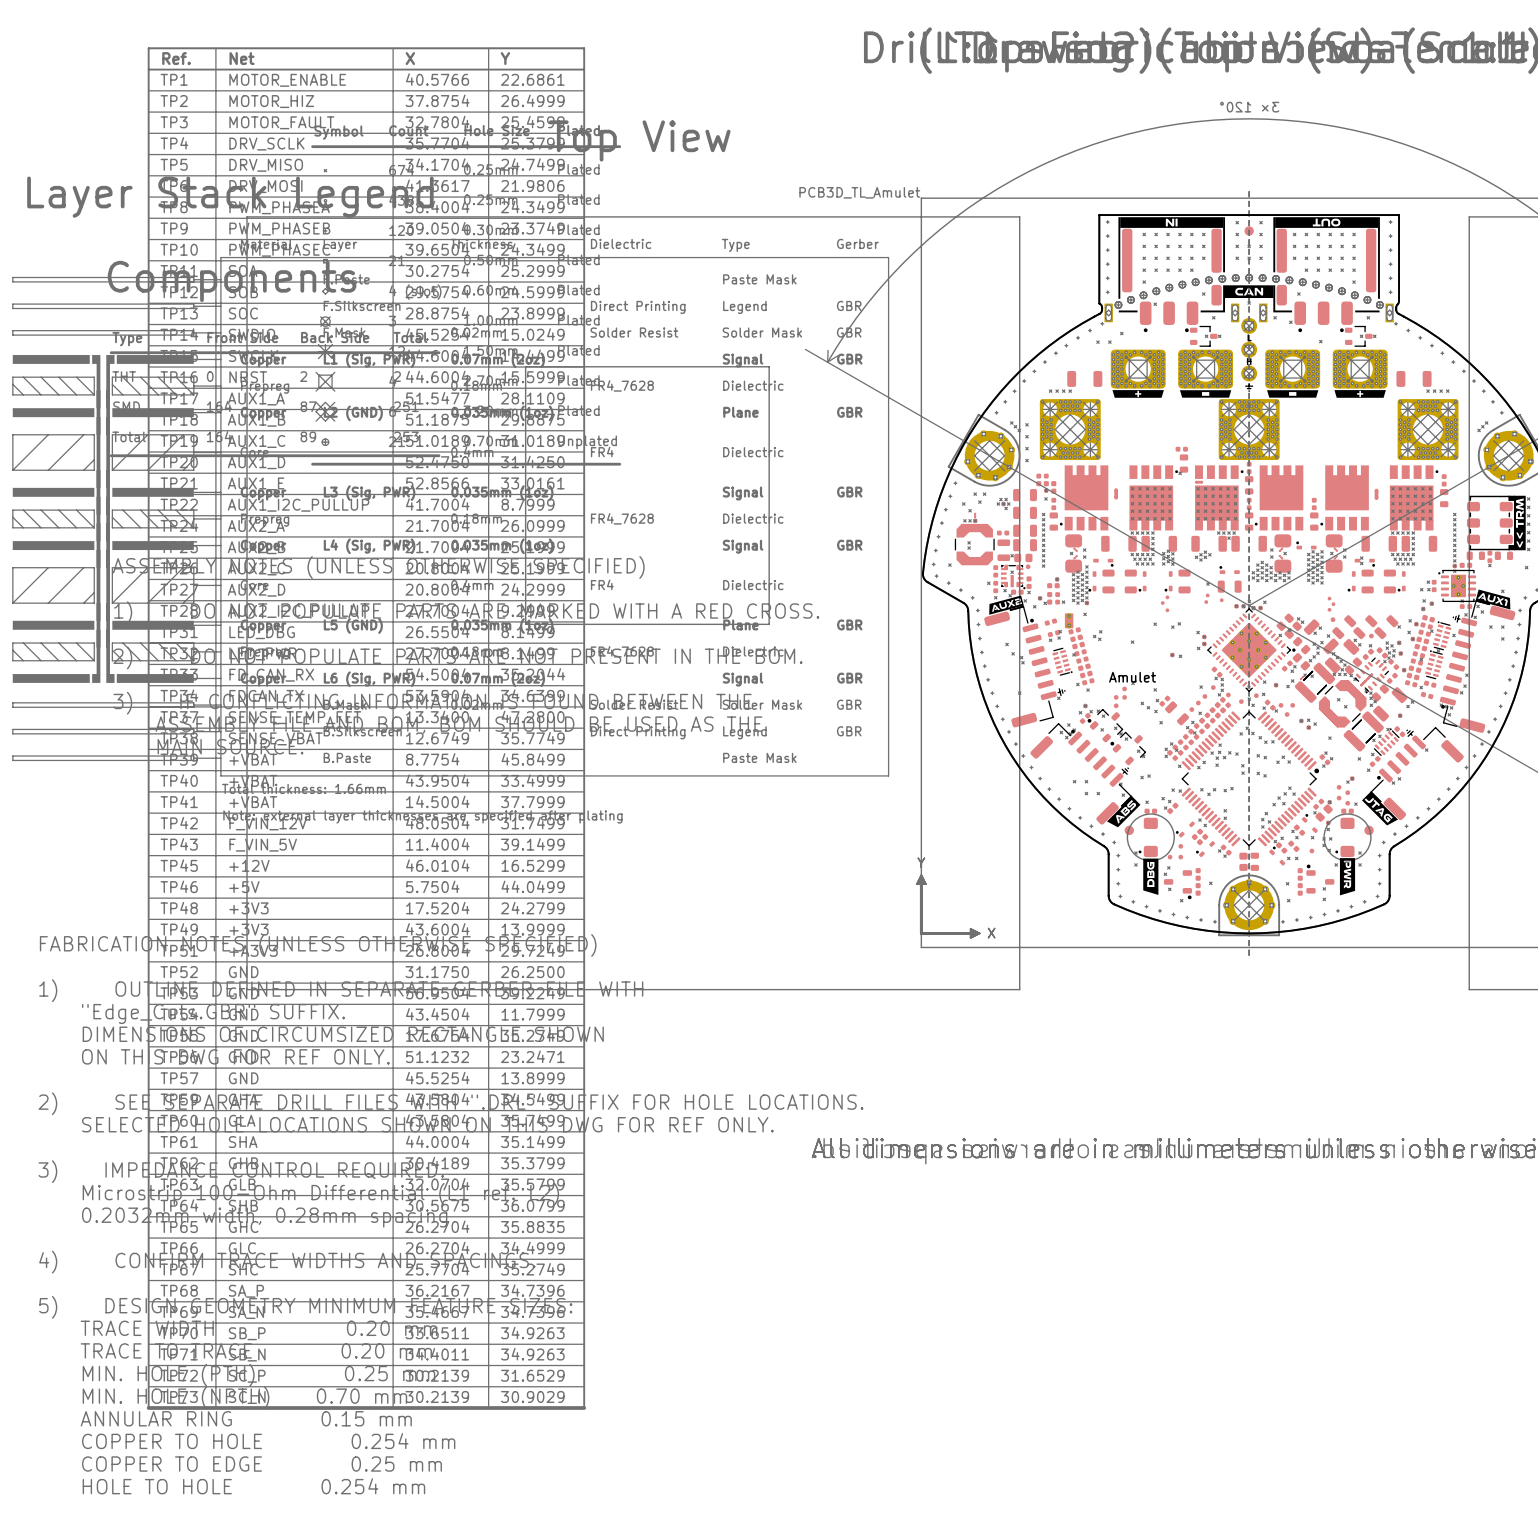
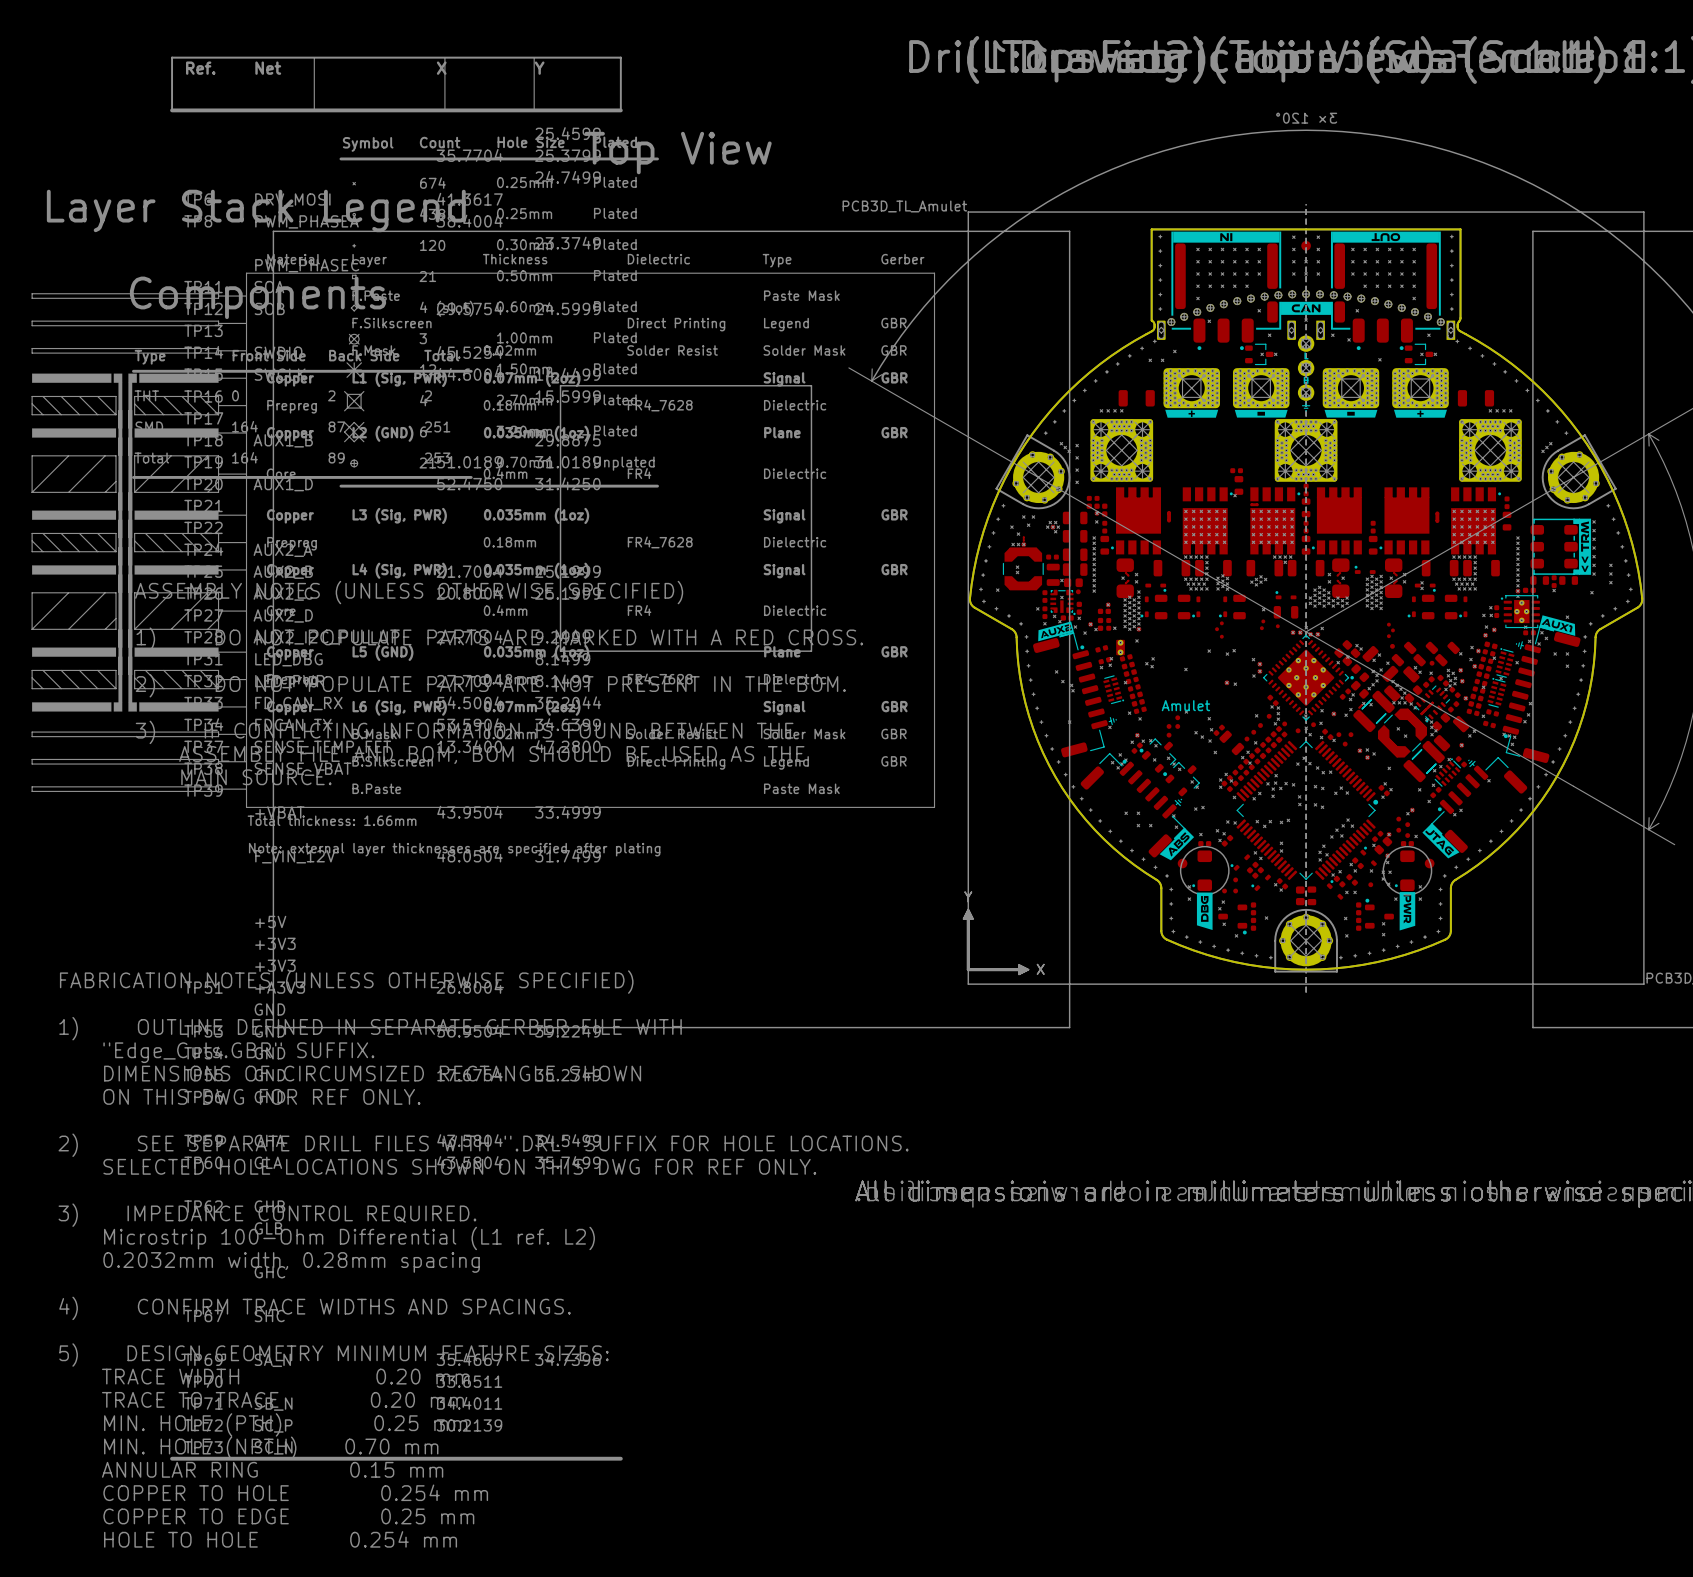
line: (215, 48) (215, 1408) -> none
line: none -> (314, 57) (314, 110)
line: (393, 48) (393, 1408) -> none
line: none -> (444, 57) (444, 110)
line: (488, 48) (488, 1408) -> none
line: none -> (534, 57) (534, 110)
line: (148, 69) (584, 69) -> none
text: TP1 (174, 79) -> none
text: 40.5766 (437, 79) -> none
text: 22.6861 (532, 79) -> none
text: MOTOR_ENABLE (287, 80) -> none
line: (148, 90) (584, 90) -> none
line: (148, 99) (148, 1408) (584, 1408) (584, 99) -> (172, 110) (620, 110) (172, 110)
text: 37.8754 (437, 100) -> none
text: 26.4999 (532, 100) -> none
text: TP2 (174, 101) -> none
text: MOTOR_HIZ (271, 101) -> none
line: (148, 112) (584, 112) -> none
text: TP3 (174, 122) -> none
text: MOTOR_FAULT (281, 122) -> none
text: 32.7804 (437, 122) -> none
line: (148, 133) (584, 133) -> none
text: TP4 (174, 143) -> none
text: DRV_SCLK (266, 144) -> none
line: (148, 154) (584, 154) -> none
text: TP5 (174, 164) -> none
text: 34.1704 (437, 164) -> none
text: DRV_MISO (266, 165) -> none
line: (148, 175) (584, 175) -> none
text: 21.9806 (532, 186) -> none
line: (148, 197) (584, 197) -> none
text: 24.3499 (532, 207) -> none
line: (148, 218) (584, 218) -> none
text: TP9 (174, 228) -> none
text: 39.0504 (437, 228) -> none
text: PWM_PHASEB (279, 229) -> none
line: (148, 239) (584, 239) -> none
text: TP10 (179, 249) -> none
text: 39.6504 (437, 249) -> none
text: 24.3499 (532, 249) -> none
line: (148, 260) (584, 260) -> none
text: 30.2754 (437, 270) -> none
text: 25.2999 (532, 271) -> none
line: (148, 282) (584, 282) -> none
line: (148, 303) (584, 303) -> none
text: SOC (243, 313) -> none
text: 28.8754 (437, 313) -> none
text: 23.8999 (532, 313) -> none
line: (148, 324) (584, 324) -> none
text: 15.0249 (533, 334) -> none
line: (148, 345) (584, 345) -> none
line: (148, 367) (584, 367) -> none
text: 44.6004 (437, 376) -> none
text: NRST (248, 377) -> none
line: (148, 388) (584, 388) -> none
text: AUX1_A (256, 398) -> none
text: 51.5477 (437, 398) -> none
text: 28.1109 (532, 398) -> none
line: (148, 409) (584, 409) -> none
text: 51.1875 (437, 419) -> none
line: (148, 430) (584, 430) -> none
text: AUX1_C (256, 441) -> none
line: (148, 451) (584, 451) -> none
line: (148, 473) (584, 473) -> none
text: AUX1_E (256, 483) -> none
text: 52.8566 (437, 483) -> none
text: 33.0161 (532, 483) -> none
line: (148, 494) (584, 494) -> none
text: 41.7004 (437, 504) -> none
text: 8.7999 (528, 504) -> none
text: AUX1_I2C_PULLUP (298, 505) -> none
line: (148, 515) (584, 515) -> none
text: 21.7004 (437, 525) -> none
text: 26.0999 (532, 525) -> none
line: (148, 536) (584, 536) -> none
line: (148, 558) (584, 558) -> none
line: (148, 579) (584, 579) -> none
text: 20.8004 (437, 589) -> none
text: 24.2999 (532, 589) -> none
line: (148, 600) (584, 600) -> none
line: (148, 621) (584, 621) -> none
text: 26.5504 (437, 631) -> none
line: (148, 643) (584, 643) -> none
line: (148, 664) (584, 664) -> none
line: (148, 685) (584, 685) -> none
line: (148, 706) (584, 706) -> none
line: (148, 728) (584, 728) -> none
text: 12.6749 (437, 738) -> none
text: 35.7749 (532, 738) -> none
line: (148, 749) (584, 749) -> none
text: +VBAT (253, 759) -> none
text: 8.7754 (432, 759) -> none
text: 45.8499 (533, 759) -> none
line: (148, 770) (584, 770) -> none
text: TP40 (179, 780) -> none
line: (148, 791) (584, 791) -> none
text: TP41 (179, 801) -> none
text: 14.5004 (437, 801) -> none
text: +VBAT (253, 802) -> none
text: 37.7999 (532, 802) -> none
line: (148, 813) (584, 813) -> none
text: TP42 (179, 823) -> none
line: (148, 834) (584, 834) -> none
text: TP43 (179, 844) -> none
text: 11.4004 (437, 844) -> none
text: 39.1499 (532, 844) -> none
text: F_VIN_5V (263, 845) -> none
line: (148, 855) (584, 855) -> none
text: TP45 (179, 865) -> none
text: +12V (249, 865) -> none
text: 46.0104 (437, 865) -> none
text: 16.5299 (533, 865) -> none
line: (148, 876) (584, 876) -> none
text: TP46 (179, 886) -> none
text: 5.7504 (432, 886) -> none
text: 44.0499 (533, 886) -> none
line: (148, 898) (584, 898) -> none
text: TP48 (179, 908) -> none
text: 17.5204 (437, 908) -> none
text: 24.2799 (532, 908) -> none
line: (148, 919) (584, 919) -> none
text: TP49 (179, 929) -> none
text: 43.6004 (437, 929) -> none
text: 13.9999 (533, 929) -> none
line: (148, 940) (584, 940) -> none
text: 29.7249 (532, 950) -> none
line: (148, 961) (584, 961) -> none
text: TP52 (179, 972) -> none
text: 31.1750 (437, 972) -> none
text: 26.2500 (532, 972) -> none
line: (148, 983) (584, 983) -> none
line: (148, 1004) (584, 1004) -> none
text: 43.4504 (437, 1014) -> none
text: 11.7999 (533, 1014) -> none
line: (148, 1025) (584, 1025) -> none
line: (148, 1046) (584, 1046) -> none
text: 23.2471 (532, 1056) -> none
text: 51.1232 (437, 1057) -> none
line: (148, 1068) (584, 1068) -> none
text: TP57 (179, 1078) -> none
text: GND (243, 1078) -> none
text: 45.5254 (437, 1078) -> none
text: 13.8999 (533, 1078) -> none
line: (148, 1089) (584, 1089) -> none
line: (148, 1110) (584, 1110) -> none
line: (148, 1131) (584, 1131) -> none
text: 44.0004 (437, 1141) -> none
text: 35.1499 (532, 1141) -> none
text: TP61 (179, 1142) -> none
text: SHA (243, 1142) -> none
line: (148, 1153) (584, 1153) -> none
text: 30.4189 (437, 1163) -> none
text: 35.3799 (532, 1163) -> none
line: (148, 1174) (584, 1174) -> none
text: TP63 (179, 1184) -> none
text: 32.0704 (437, 1184) -> none
text: 35.5799 (532, 1184) -> none
line: (148, 1195) (584, 1195) -> none
text: TP64 (179, 1205) -> none
text: SHB (243, 1205) -> none
text: 30.5675 (437, 1205) -> none
text: 36.0799 (532, 1205) -> none
line: (148, 1216) (584, 1216) -> none
text: 26.2704 (437, 1226) -> none
text: TP65 (179, 1227) -> none
text: 35.8835 (532, 1227) -> none
line: (148, 1238) (584, 1238) -> none
text: TP66 (179, 1248) -> none
text: GLC (242, 1248) -> none
text: 26.2704 (437, 1248) -> none
text: 34.4999 (532, 1248) -> none
line: (148, 1259) (584, 1259) -> none
text: 25.7704 (437, 1269) -> none
text: 35.2749 (532, 1269) -> none
line: (148, 1280) (584, 1280) -> none
text: TP68 (179, 1290) -> none
text: 36.2167 (437, 1290) -> none
text: 34.7396 (532, 1290) -> none
text: SA_P (246, 1291) -> none
line: (148, 1301) (584, 1301) -> none
line: (148, 1323) (584, 1323) -> none
text: 34.9263 (532, 1332) -> none
text: SB_P (247, 1333) -> none
line: (148, 1344) (584, 1344) -> none
text: 34.9263 (532, 1354) -> none
line: (148, 1365) (584, 1365) -> none
text: 31.6529 (532, 1375) -> none
line: (148, 1386) (584, 1386) -> none
text: 30.2139 (437, 1396) -> none
text: 30.9029 (532, 1396) -> none

